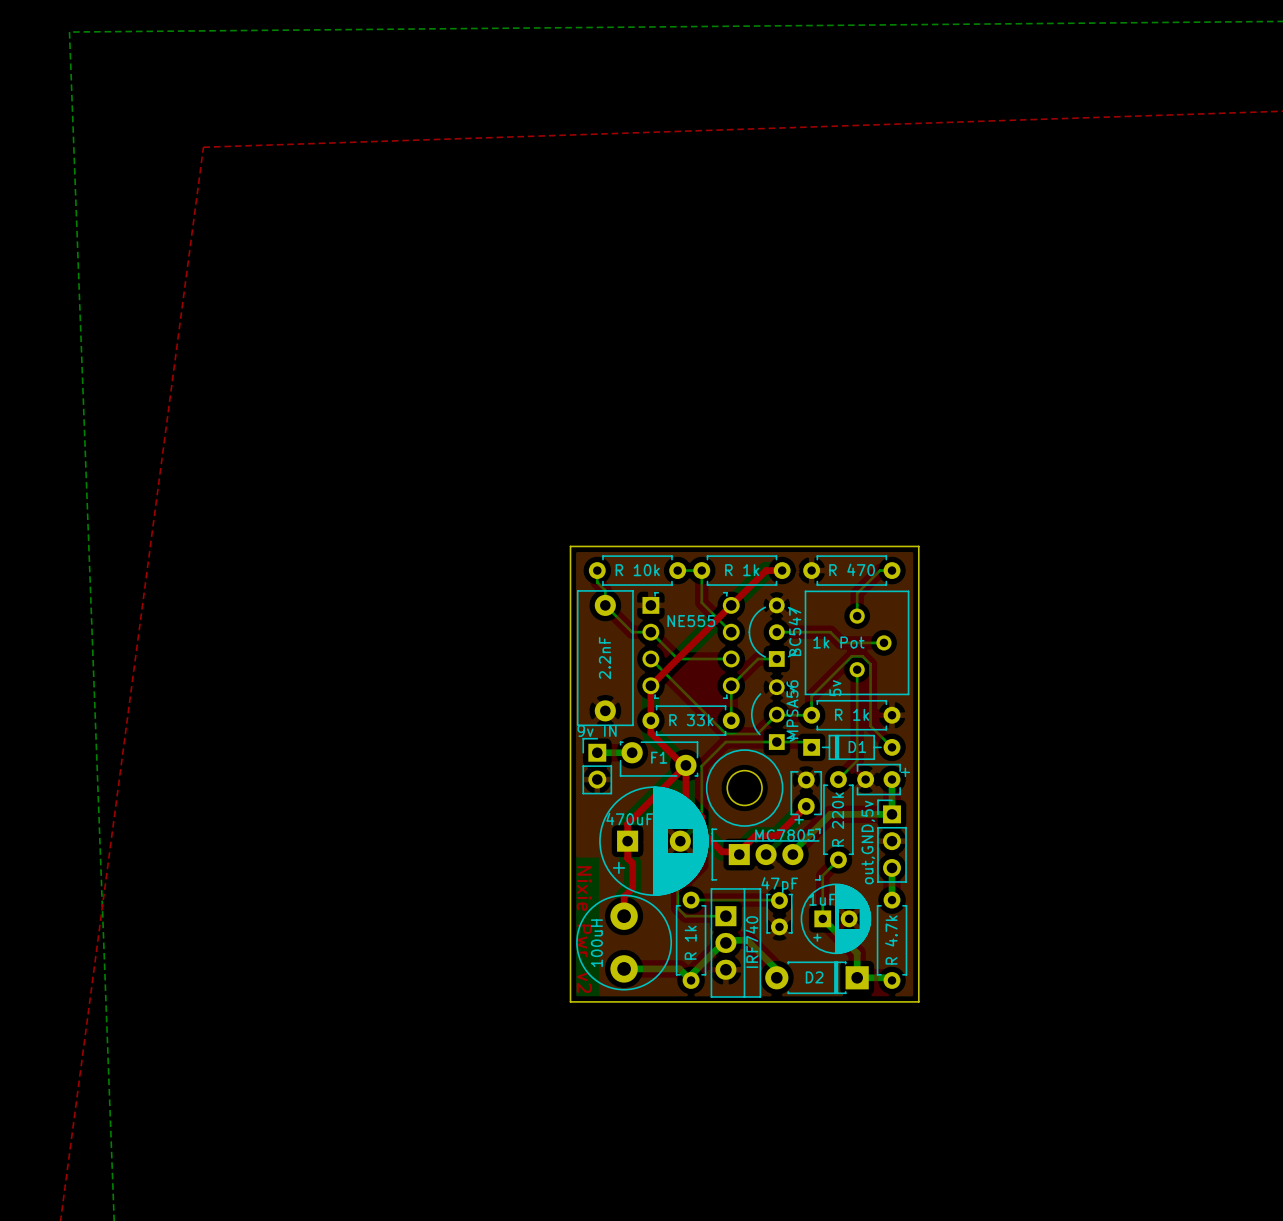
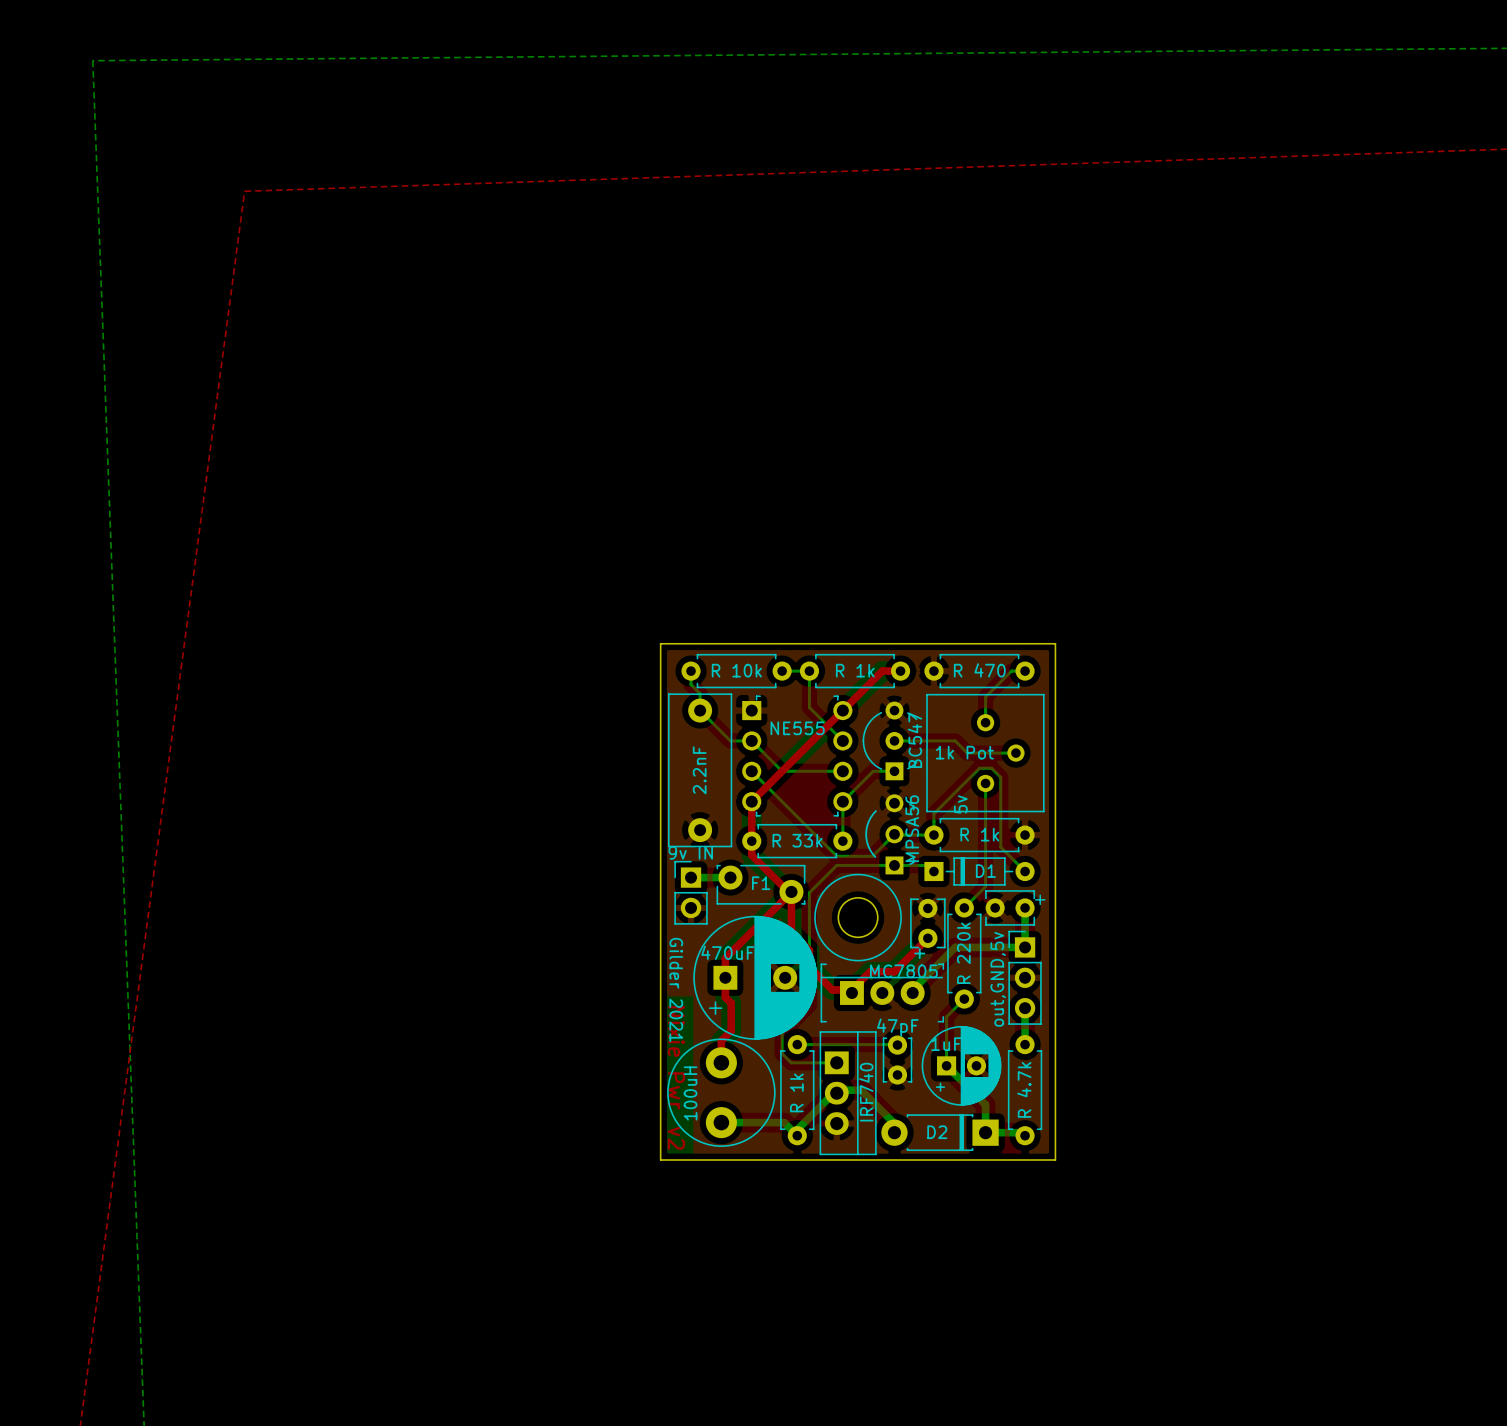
text: none -> Gilder 2021 (676, 989)

